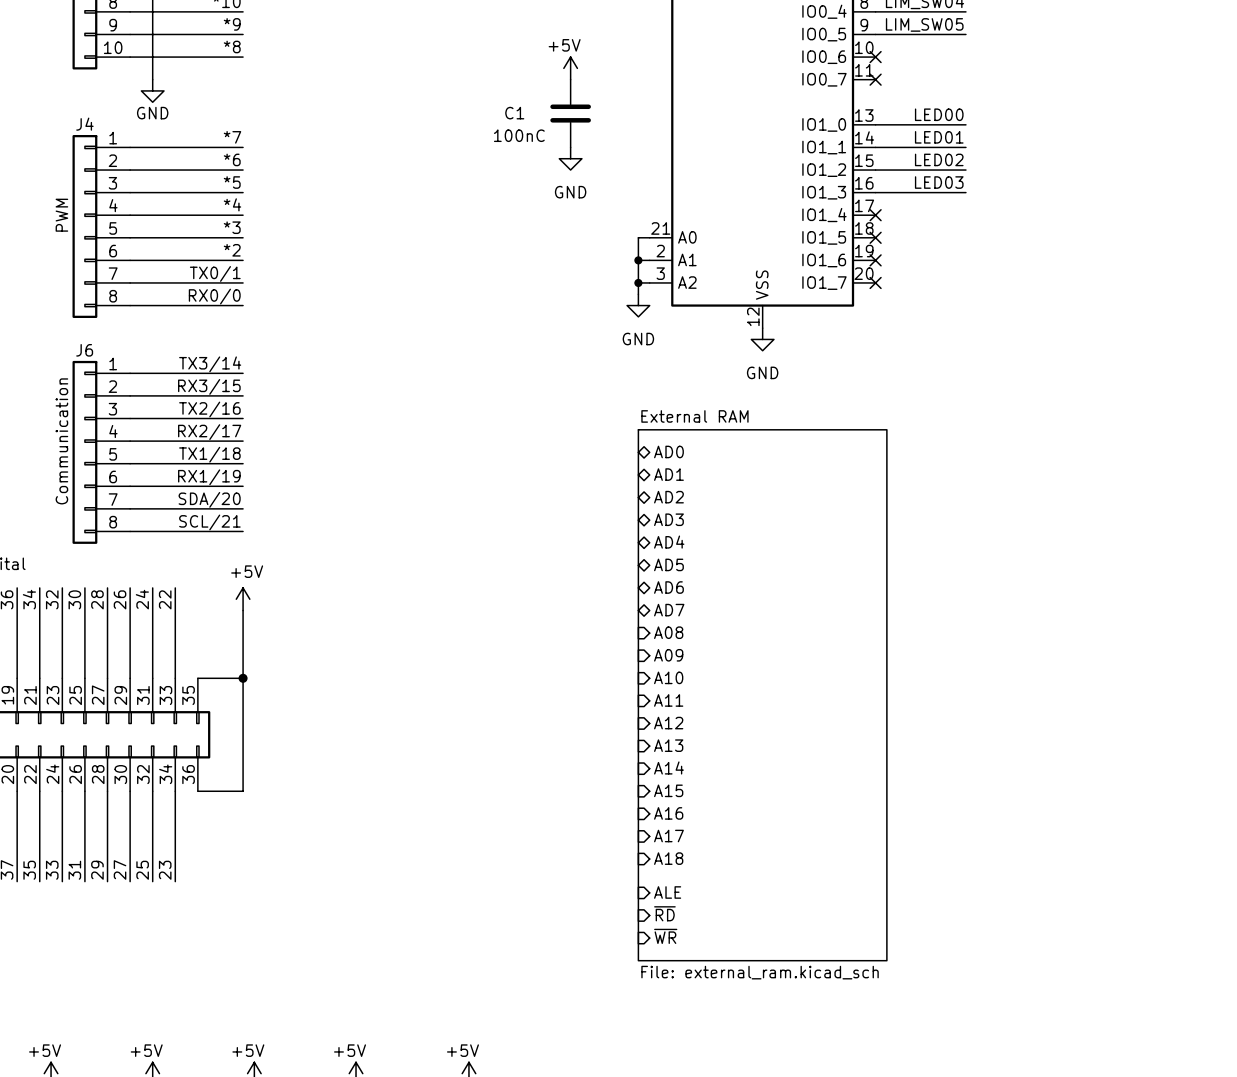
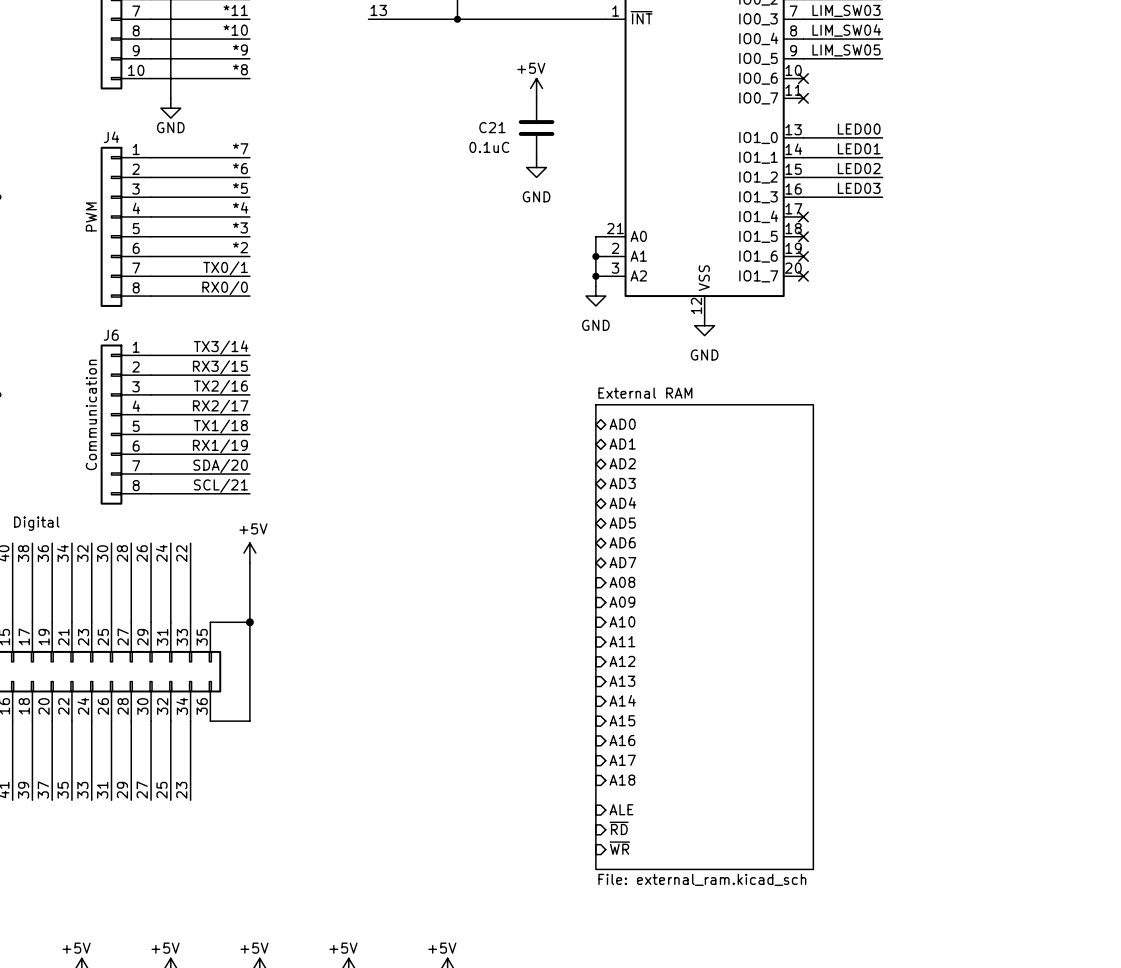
C1 name: C1 (514, 113) -> C21 (492, 127)
C1 value: 100nC (519, 135) -> 0.1uC (489, 147)

